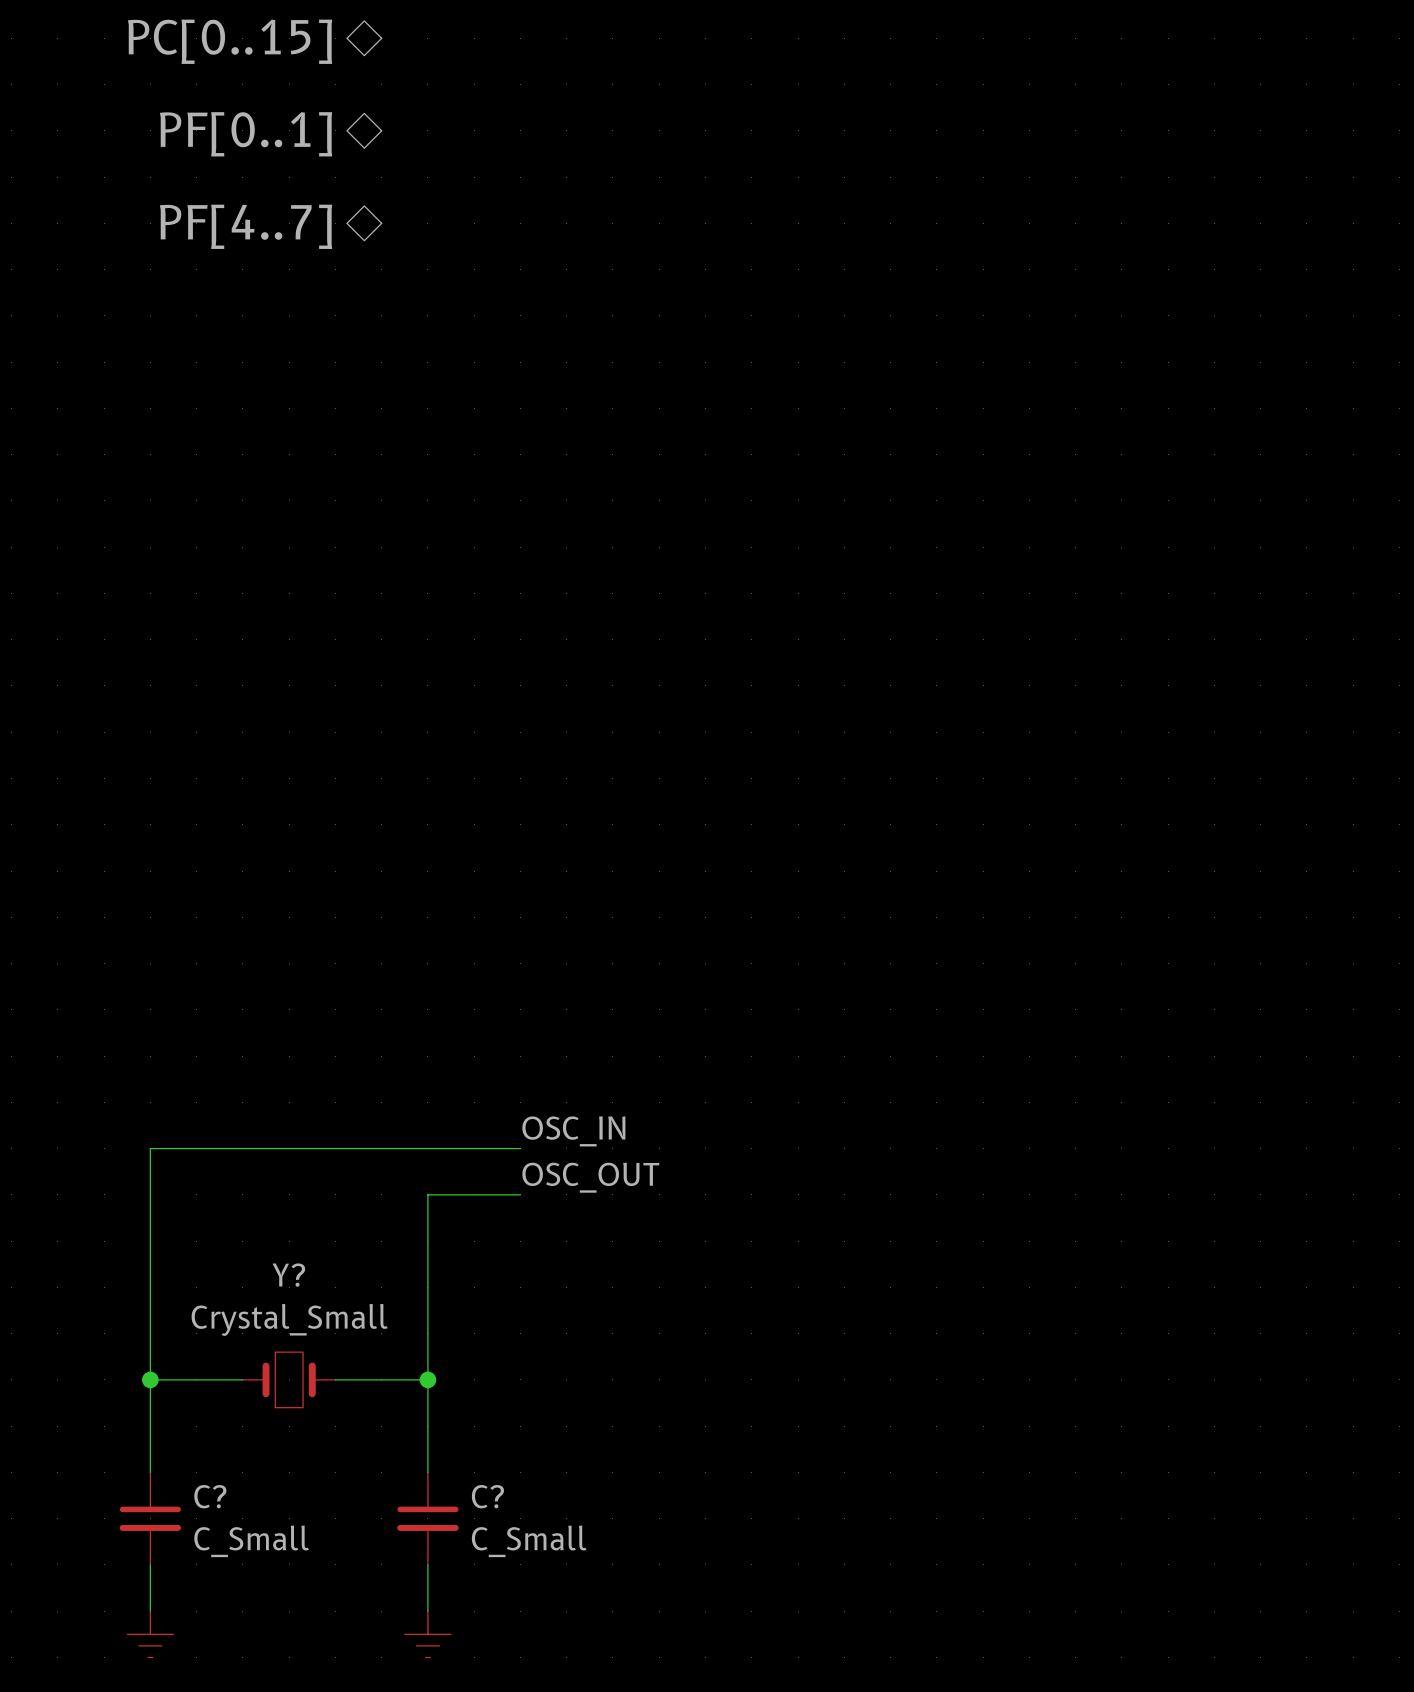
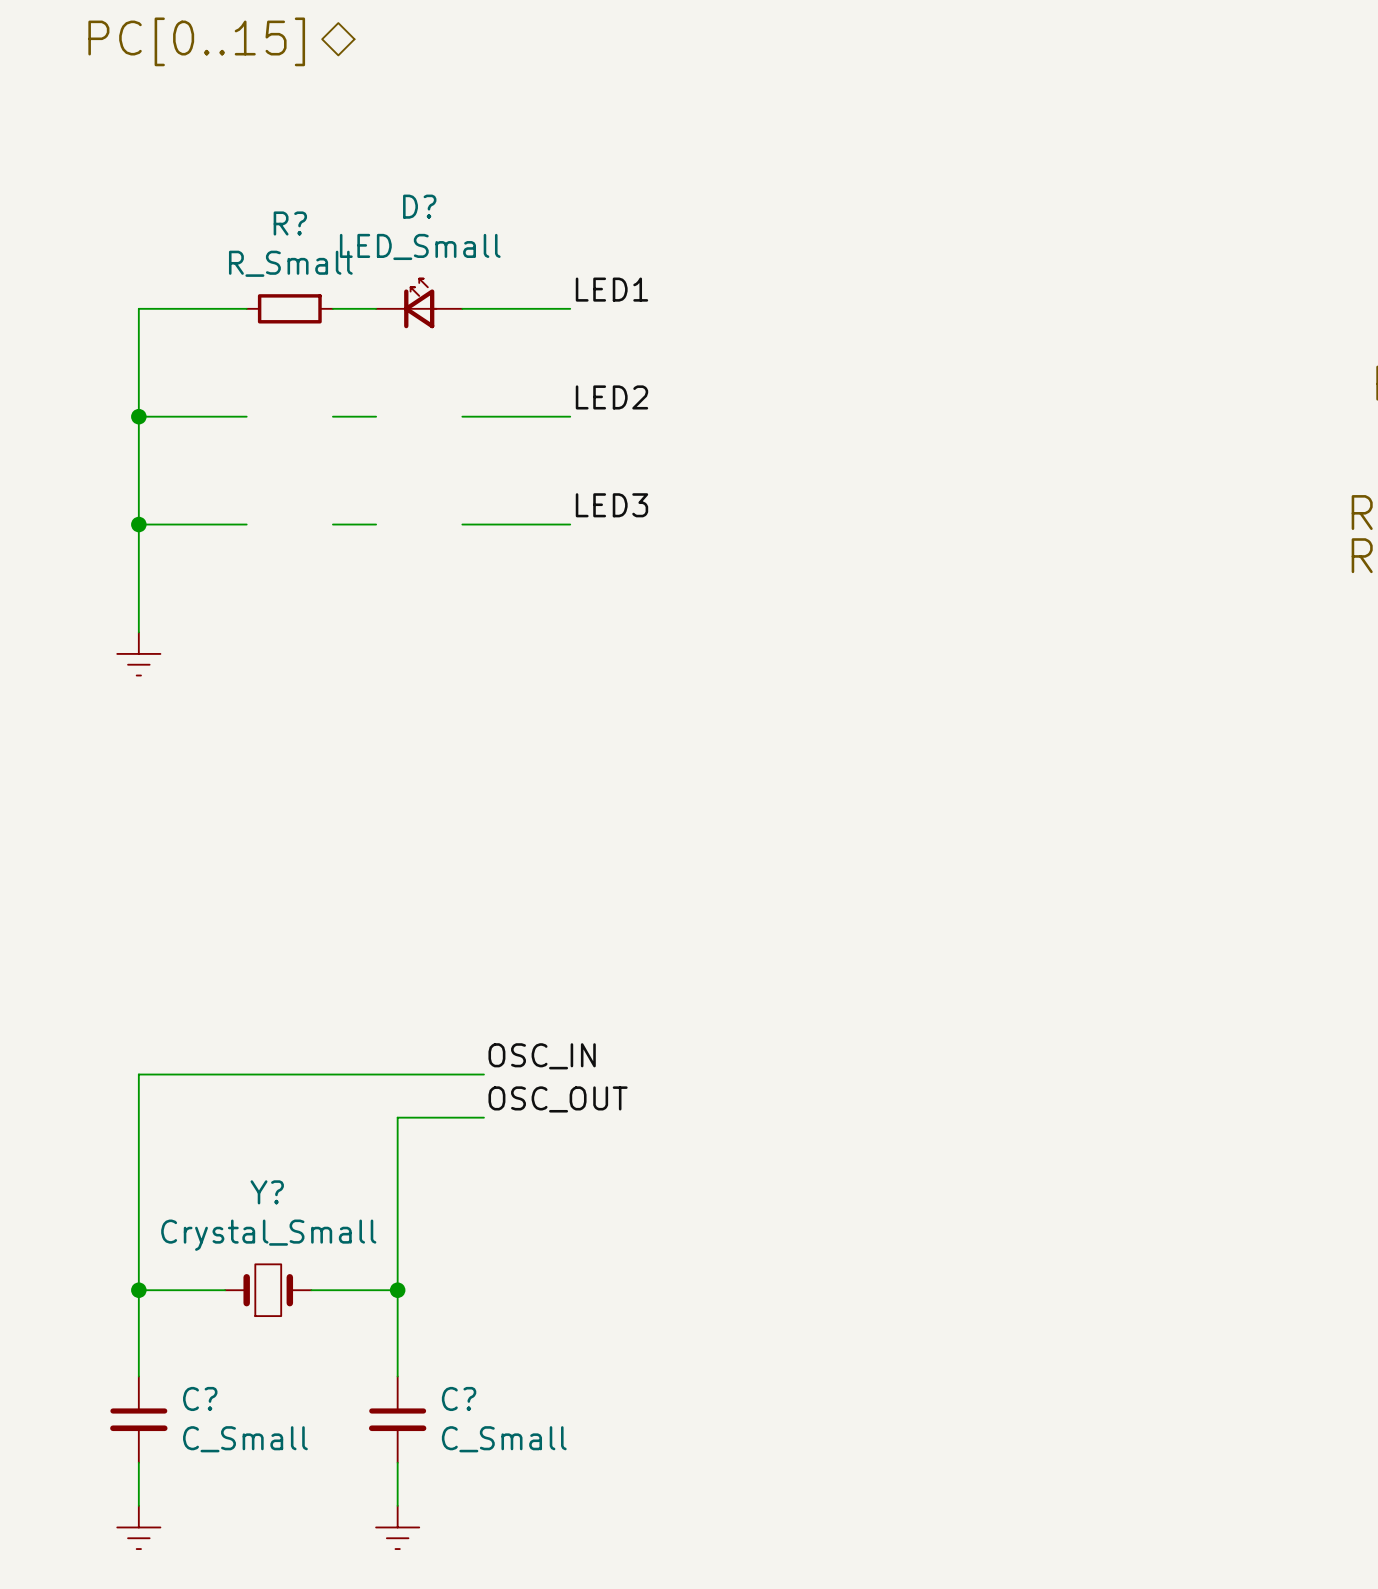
hierarchical label: PF[0..1] (246, 134) -> none
hierarchical label: PF[4..7] (246, 226) -> none
label: none -> LED1 (611, 289)
D?: none -> LED_Small (419, 303)
wire: none -> (246, 308) (138, 308) (138, 632)
R?: none -> R_Small (289, 308)
wire: none -> (332, 308) (376, 308)
wire: none -> (462, 308) (570, 308)
label: none -> LED2 (611, 397)
wire: none -> (138, 416) (246, 416)
junction: none -> (138, 416)
wire: none -> (332, 416) (376, 416)
wire: none -> (462, 416) (570, 416)
label: none -> LED3 (611, 505)
wire: none -> (138, 524) (246, 524)
junction: none -> (138, 524)
wire: none -> (332, 524) (376, 524)
wire: none -> (462, 524) (570, 524)
power symbol: none -> (138, 653)

